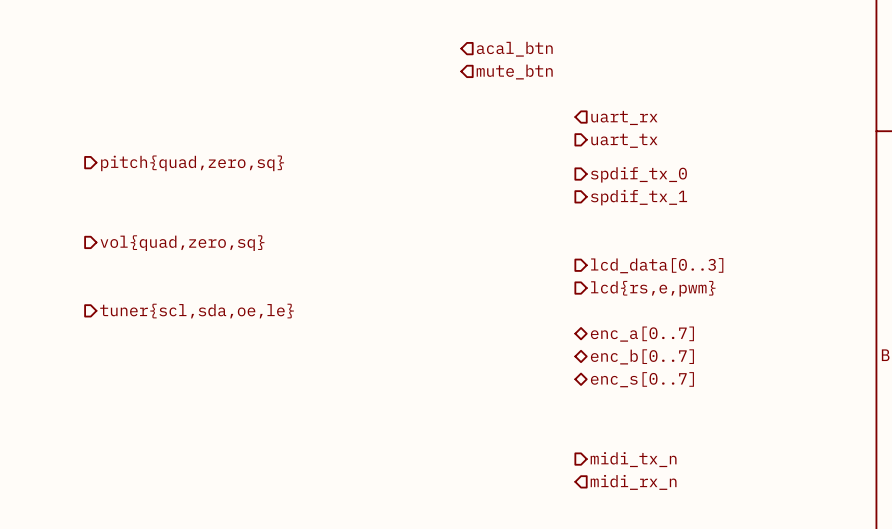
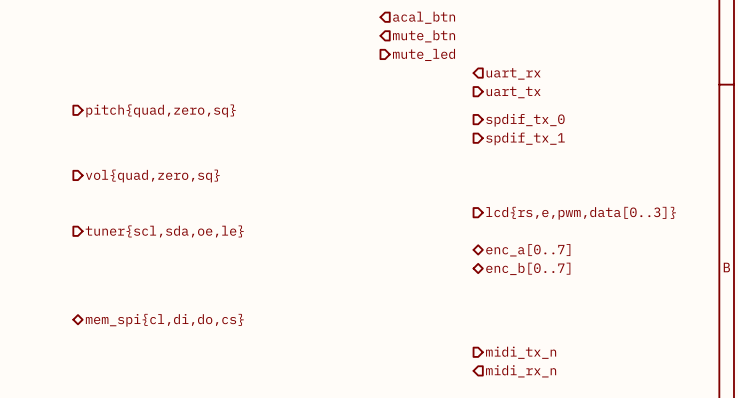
hierarchical label: none -> mute_led (424, 54)
hierarchical label: lcd_data[0..3] (657, 265) -> none
hierarchical label: lcd{rs,e,pwm} (653, 288) -> lcd{rs,e,pwm,data[0..3]} (581, 213)
hierarchical label: enc_s[0..7] (642, 379) -> none
hierarchical label: none -> mem_spi{cl,di,do,cs} (164, 320)

